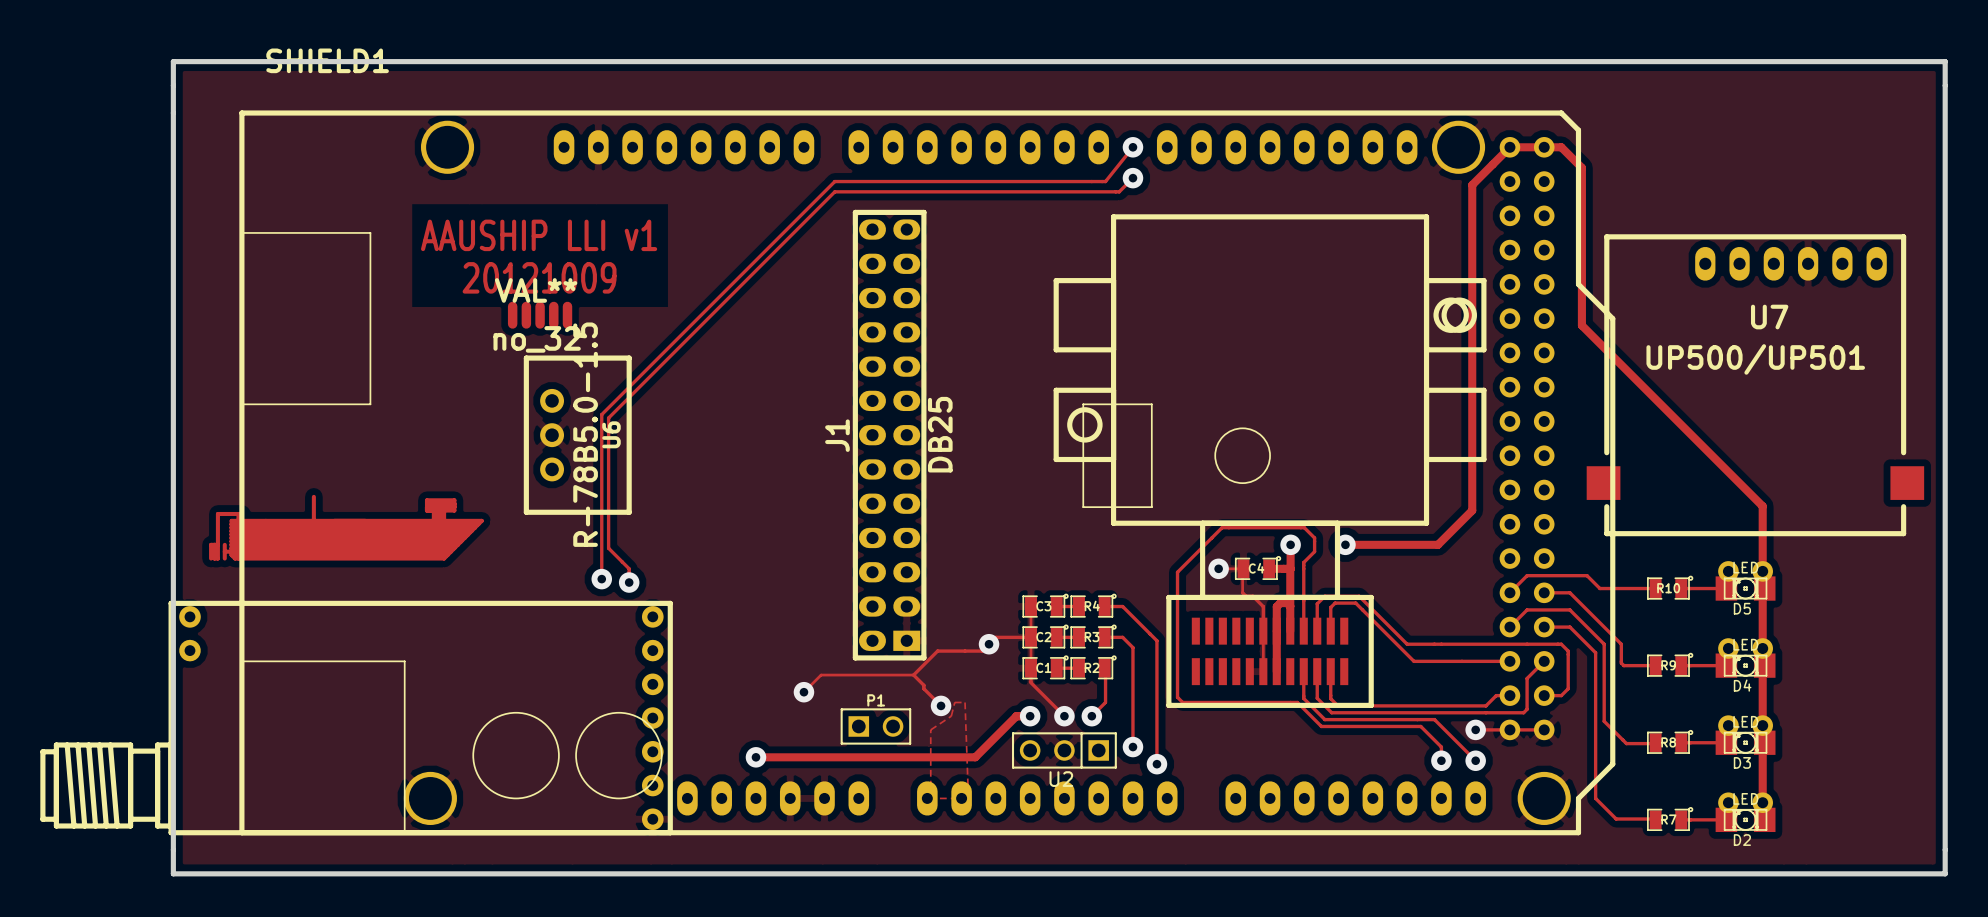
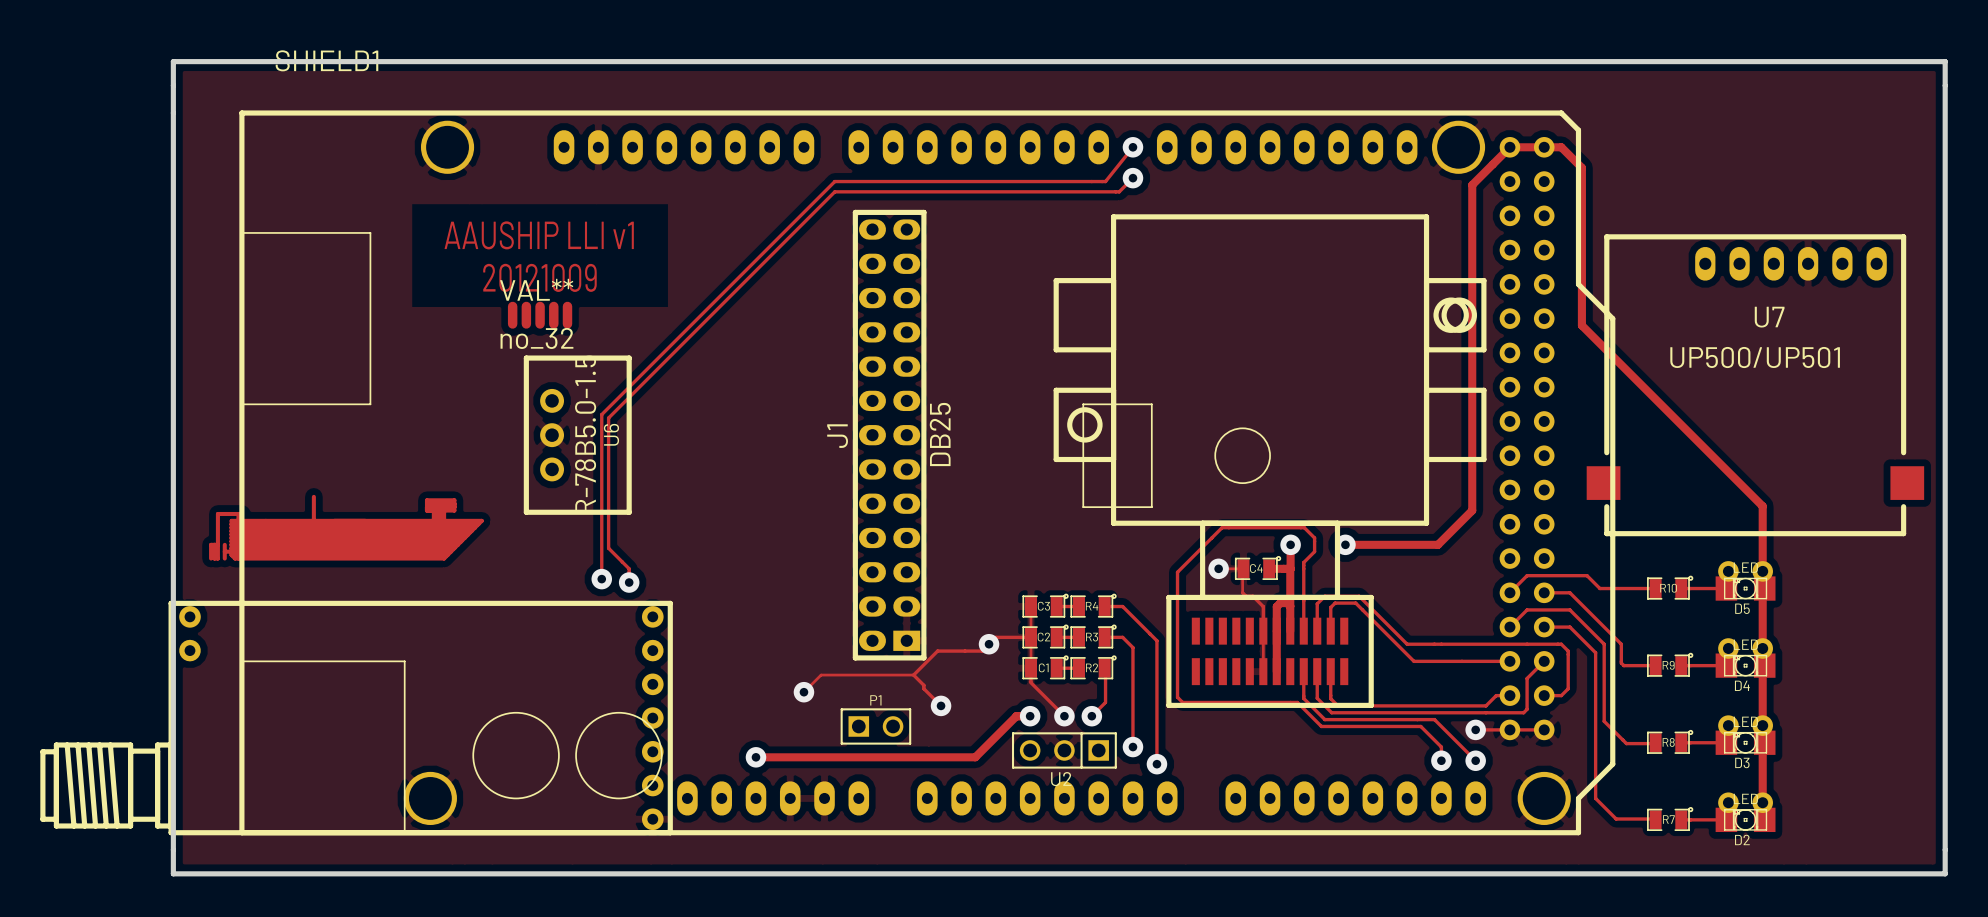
zone outline: (954, 702) (951, 716) (930, 729) (930, 798) (968, 798) (965, 702) (954, 702) -> none

